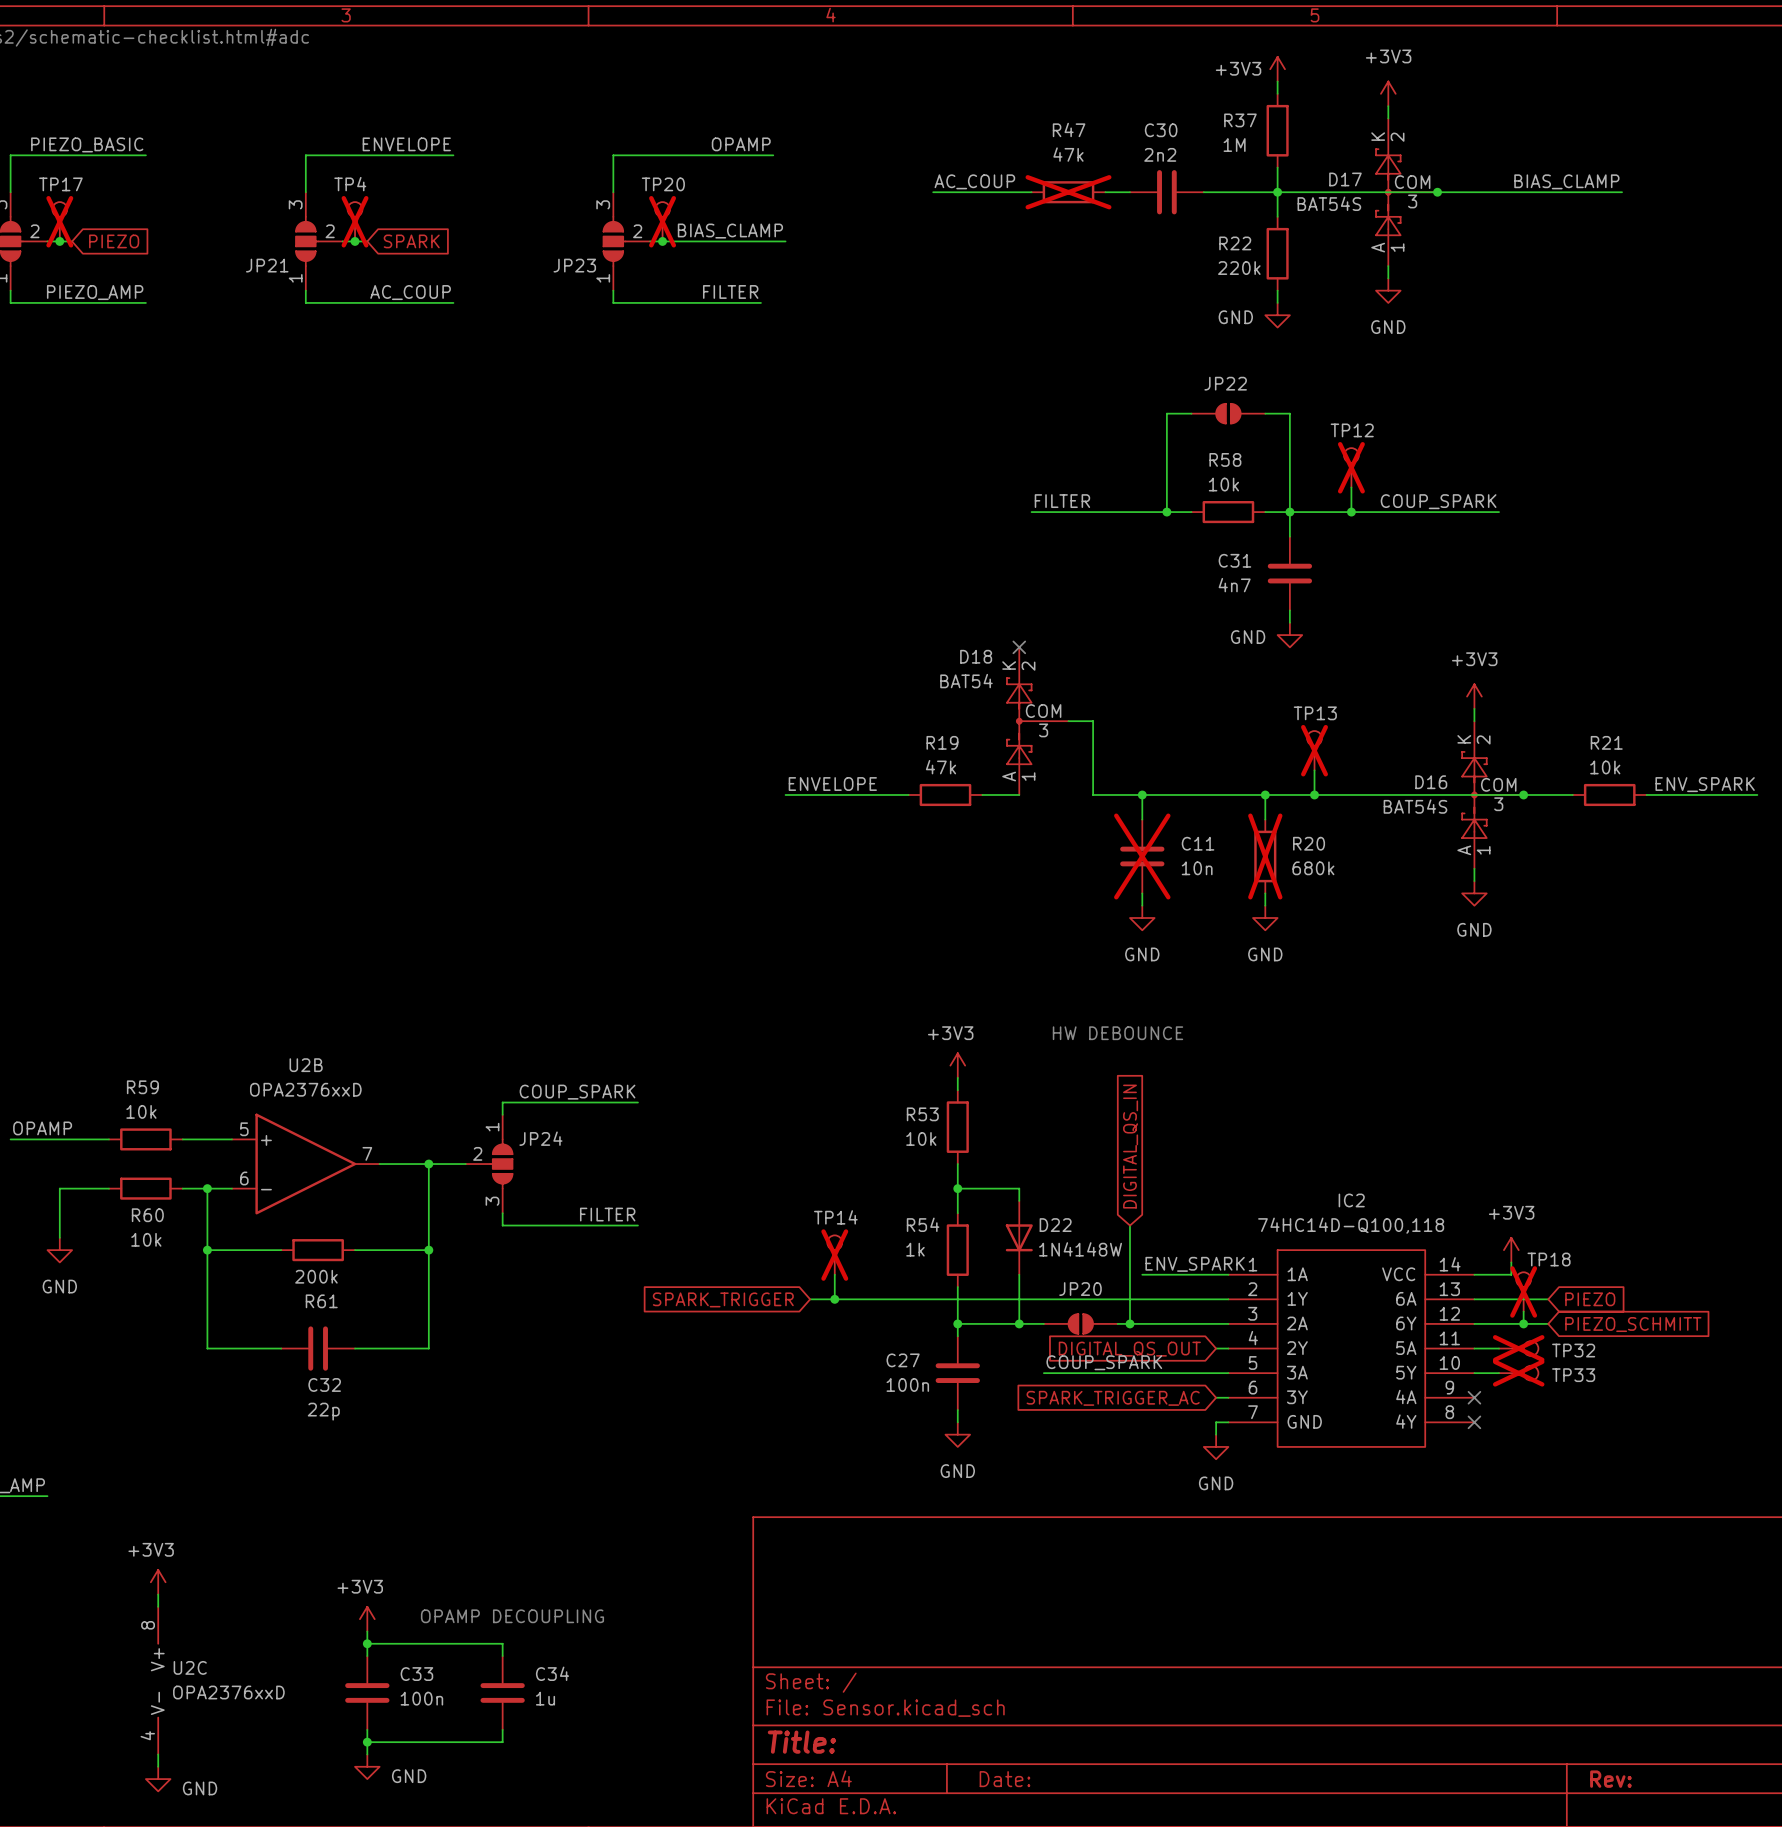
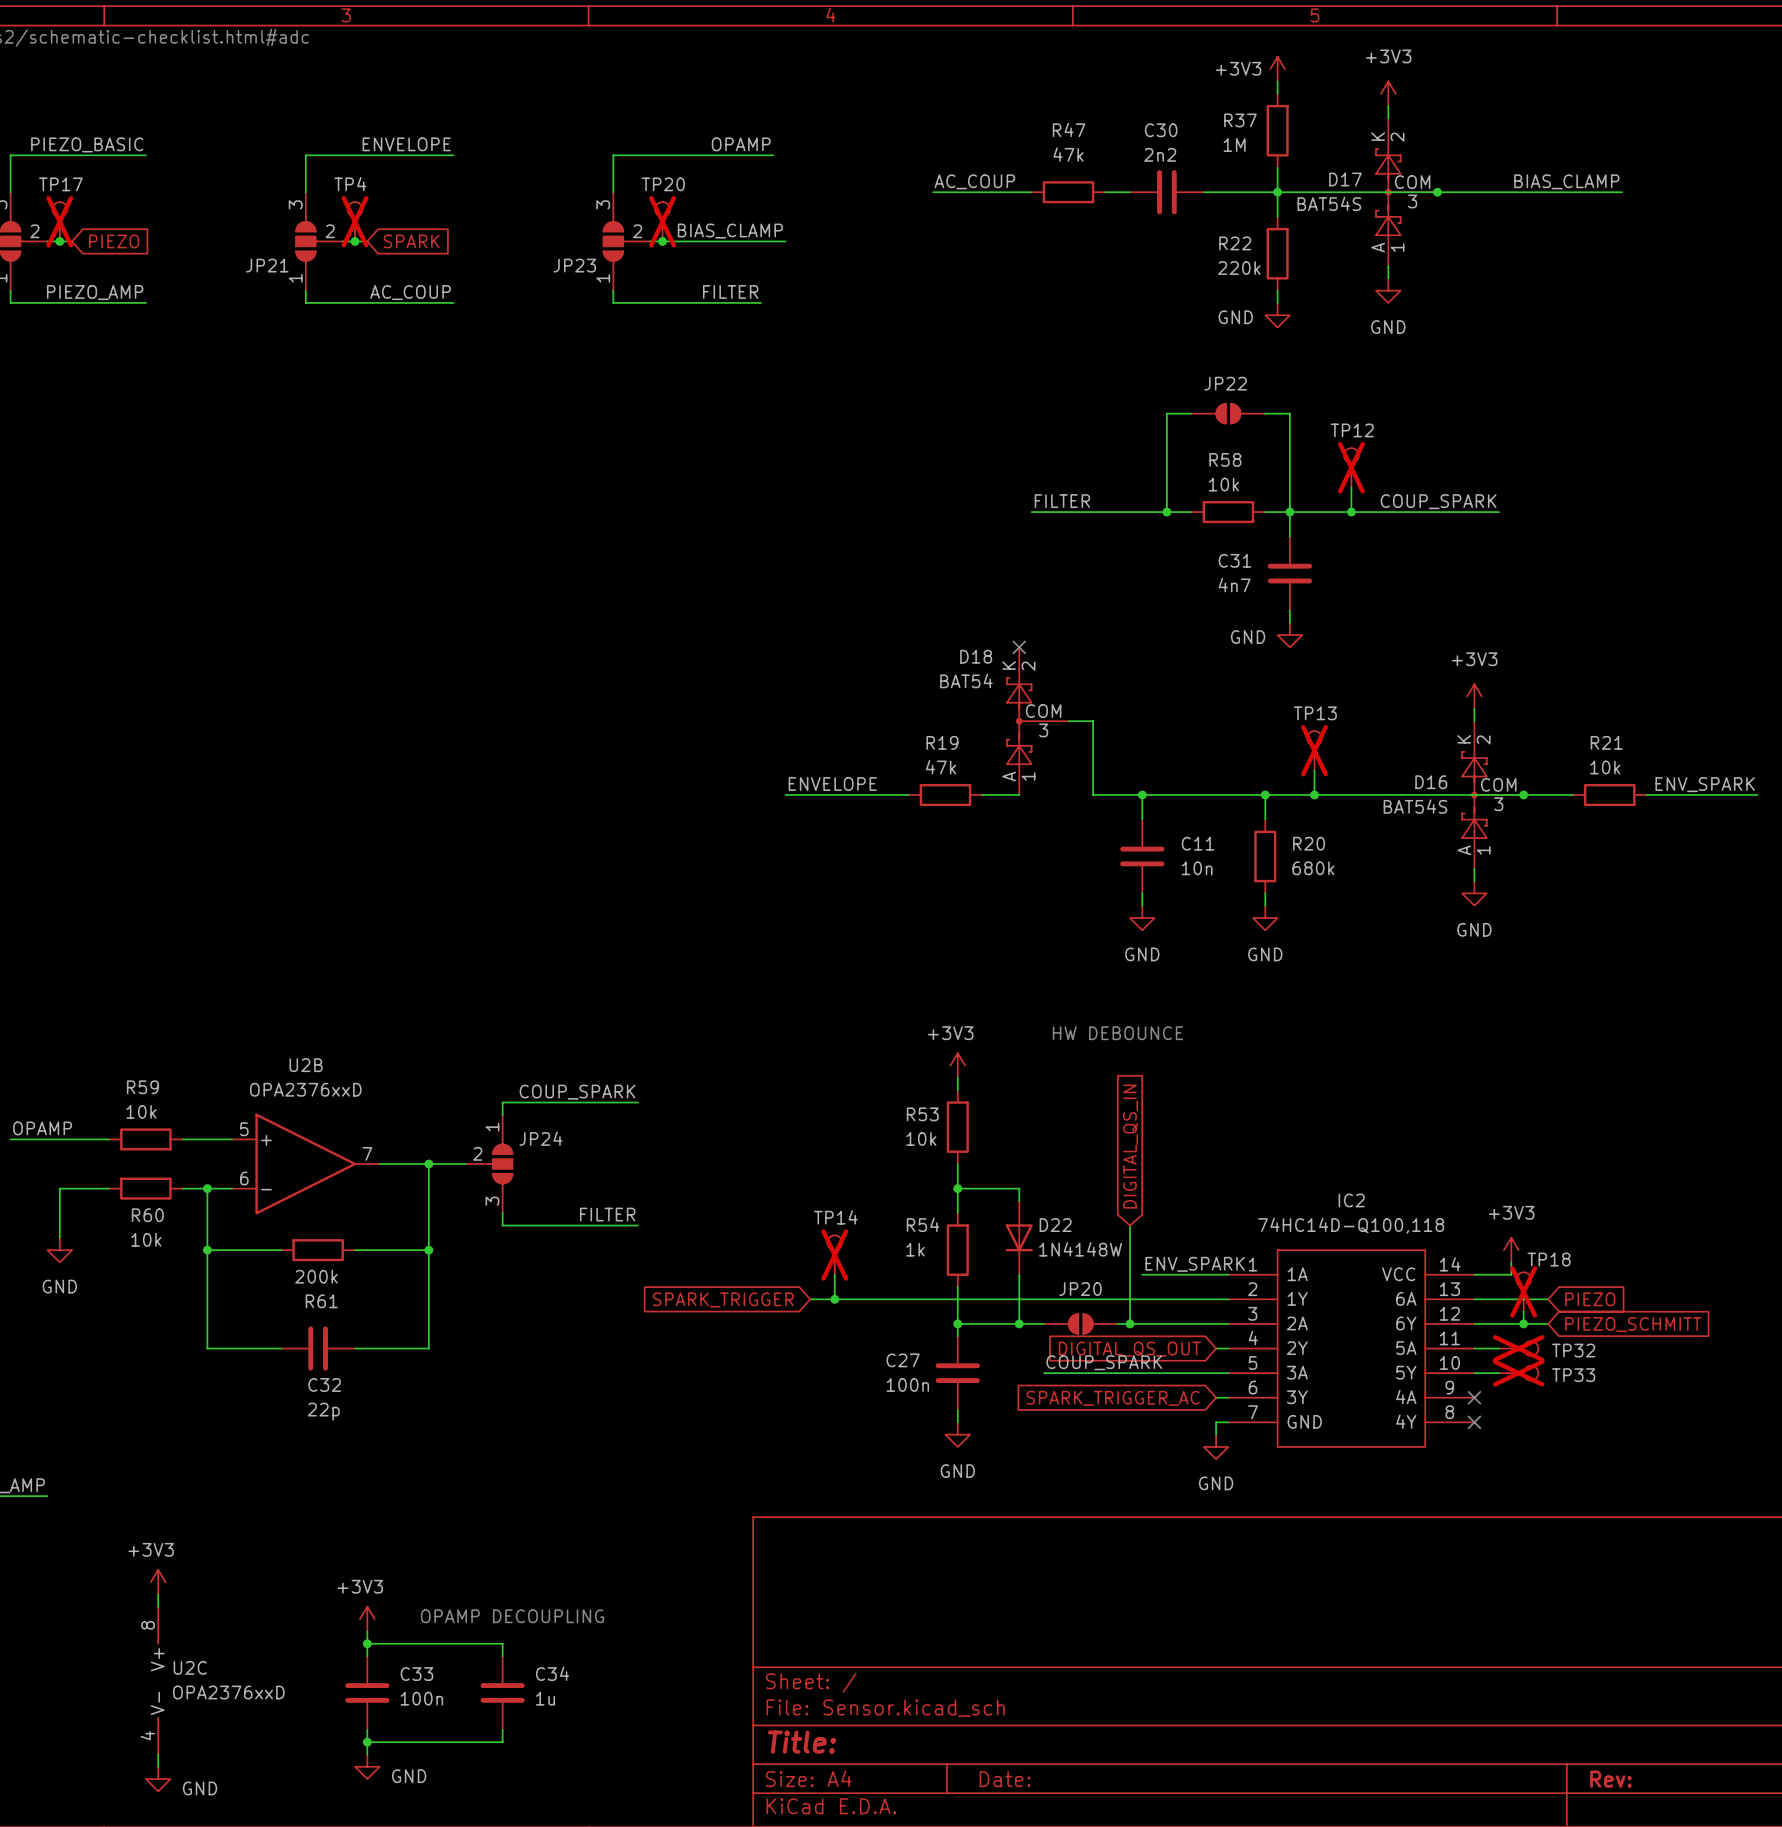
R47 do-not-place cross: (1068, 192) -> none
C11 do-not-place cross: (1142, 856) -> none
R20 do-not-place cross: (1265, 856) -> none

